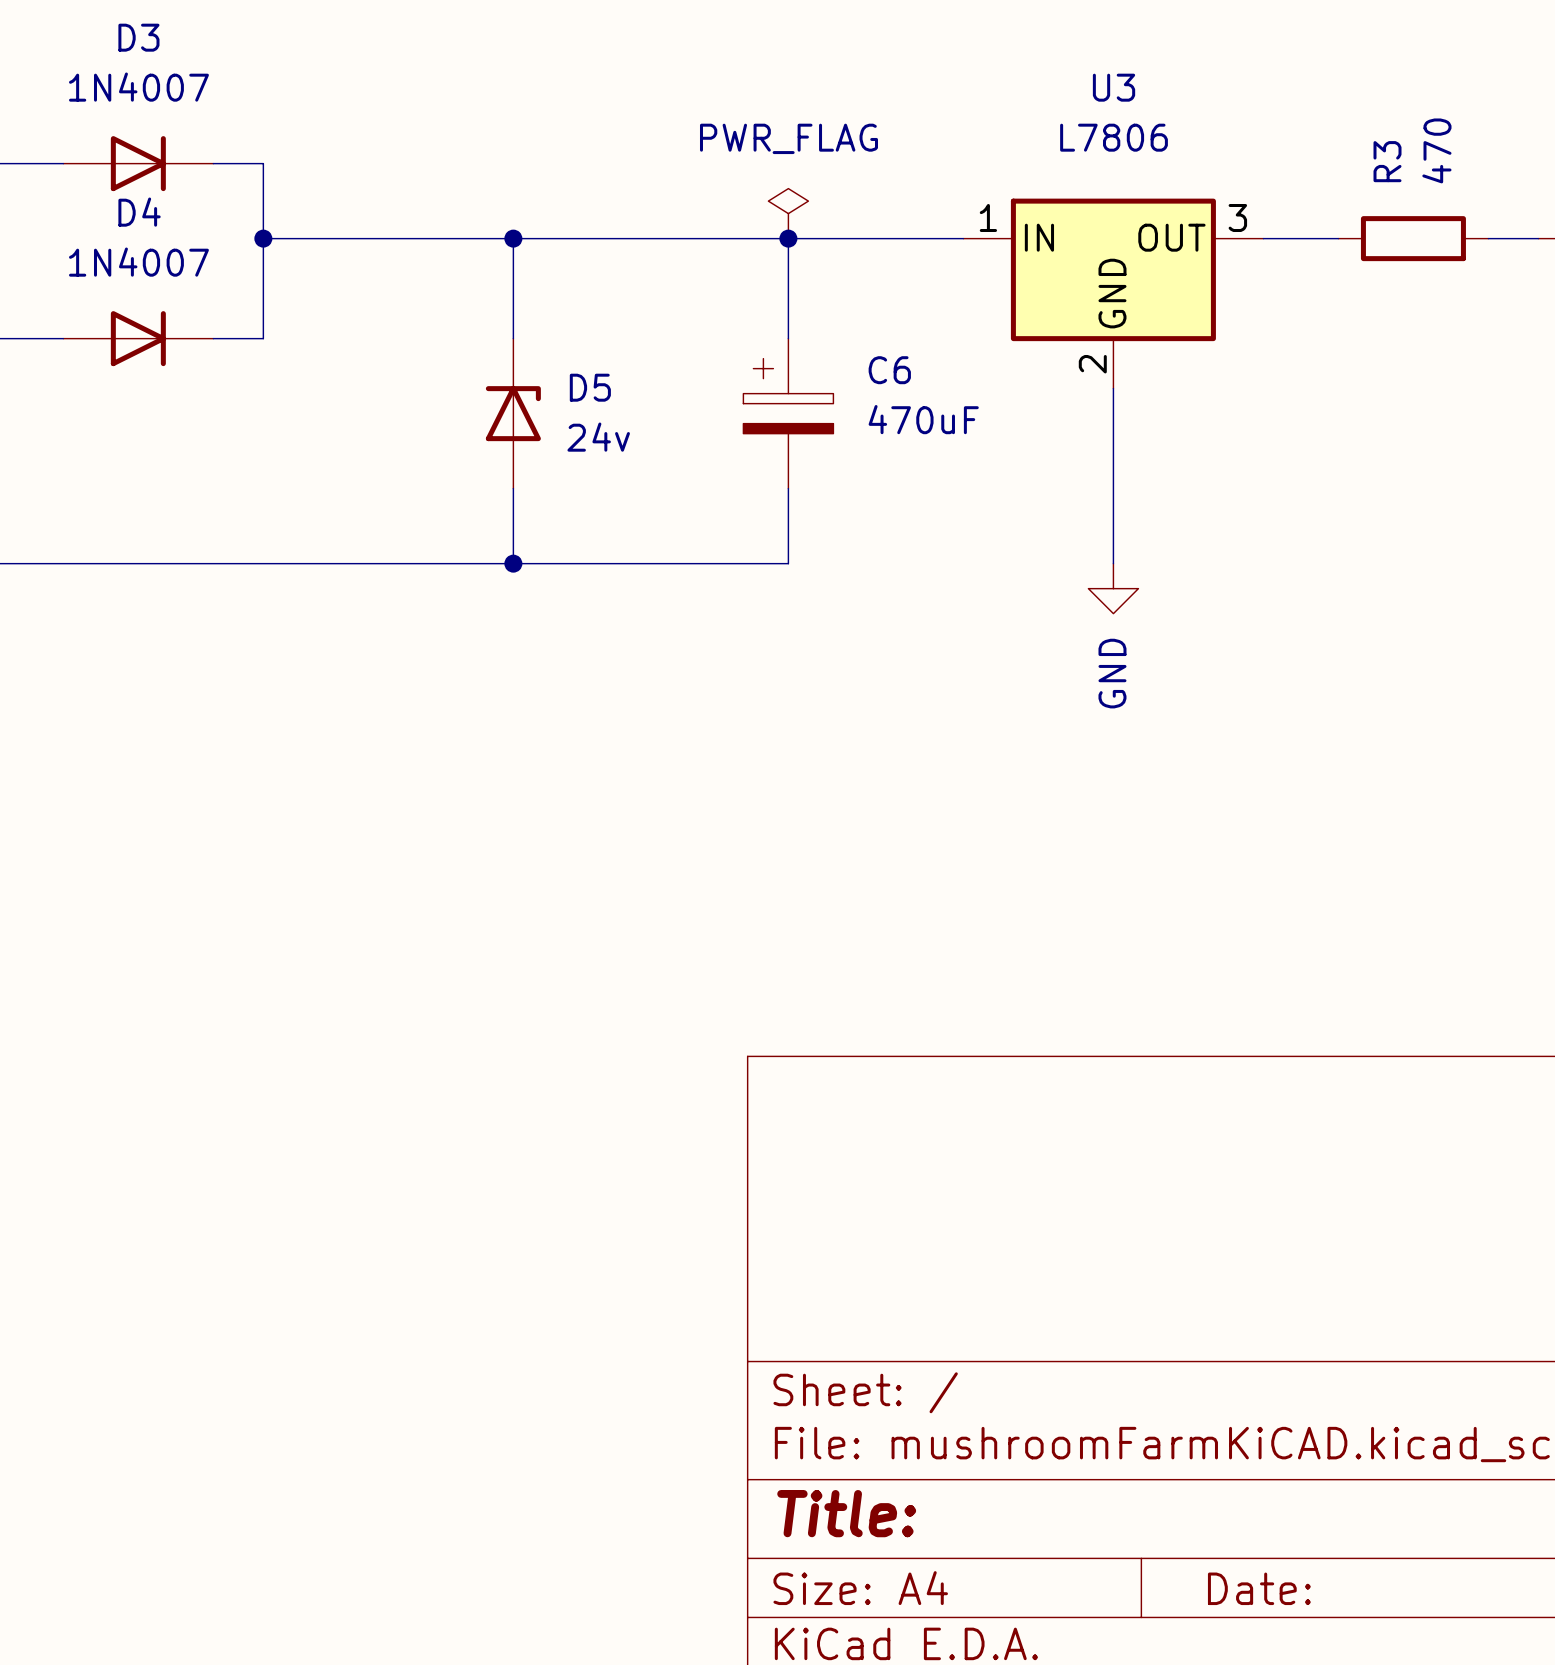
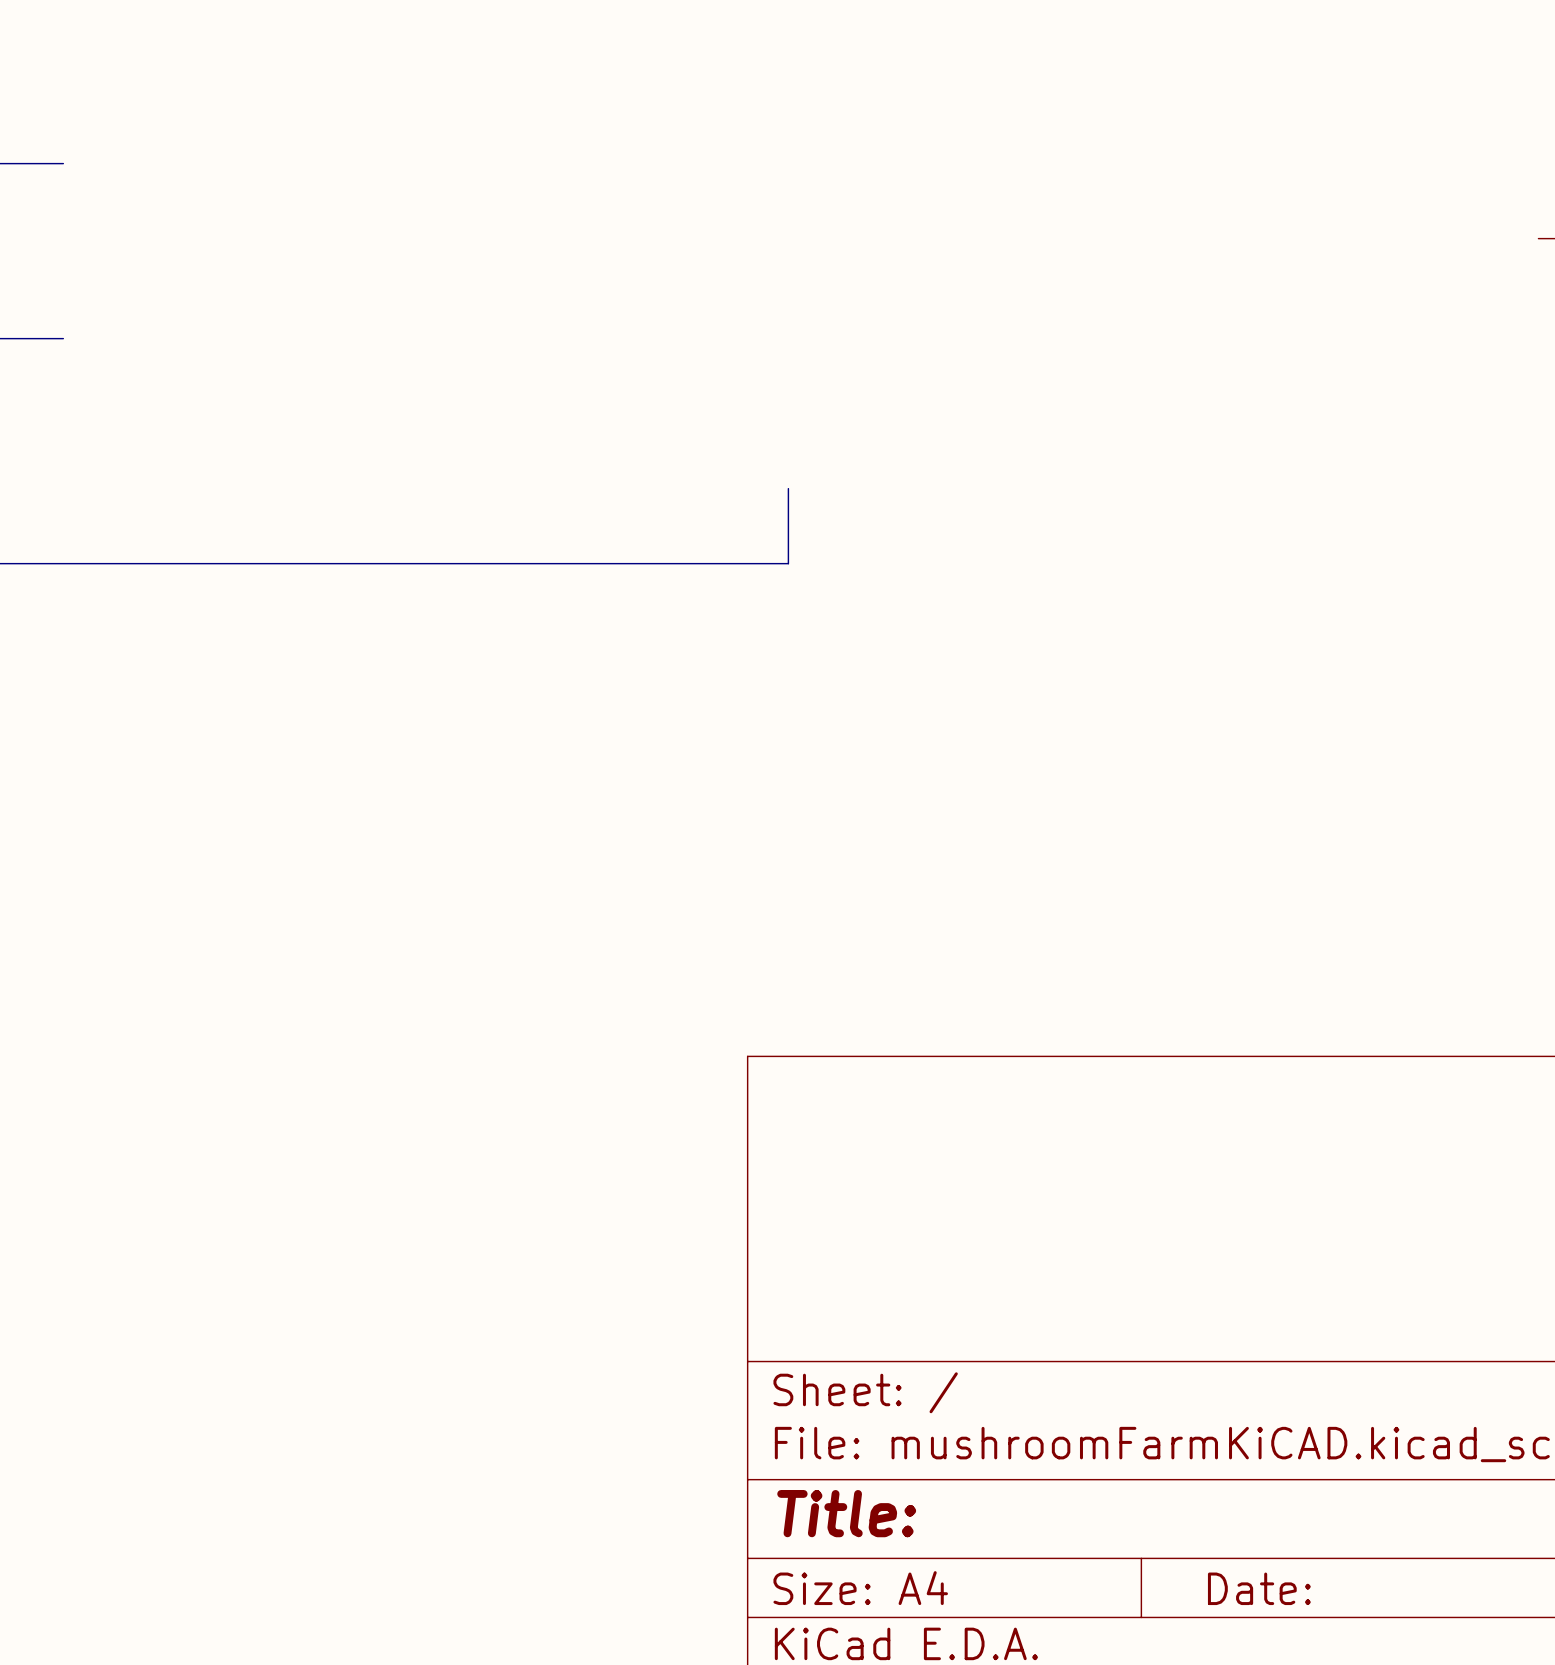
D3: 1N4007 (138, 163) -> none
wire: (213, 163) (263, 163) (263, 338) (213, 338) -> none
power symbol: PWR_FLAG (788, 213) -> none
wire: (263, 238) (963, 238) -> none
junction: (263, 238) -> none
wire: (513, 238) (513, 338) -> none
junction: (513, 238) -> none
wire: (788, 238) (788, 338) -> none
junction: (788, 238) -> none
wire: (1263, 238) (1338, 238) -> none
R3: 470 (1413, 238) -> none
wire: (1488, 238) (1538, 238) -> none
U3: L7806 (1113, 293) -> none
D4: 1N4007 (138, 338) -> none
wire: (1113, 388) (1113, 563) -> none
D5: 24v (513, 413) -> none
C6: 470uF (788, 413) -> none
wire: (513, 488) (513, 563) -> none
junction: (513, 563) -> none
power symbol: GND (1113, 588) -> none

